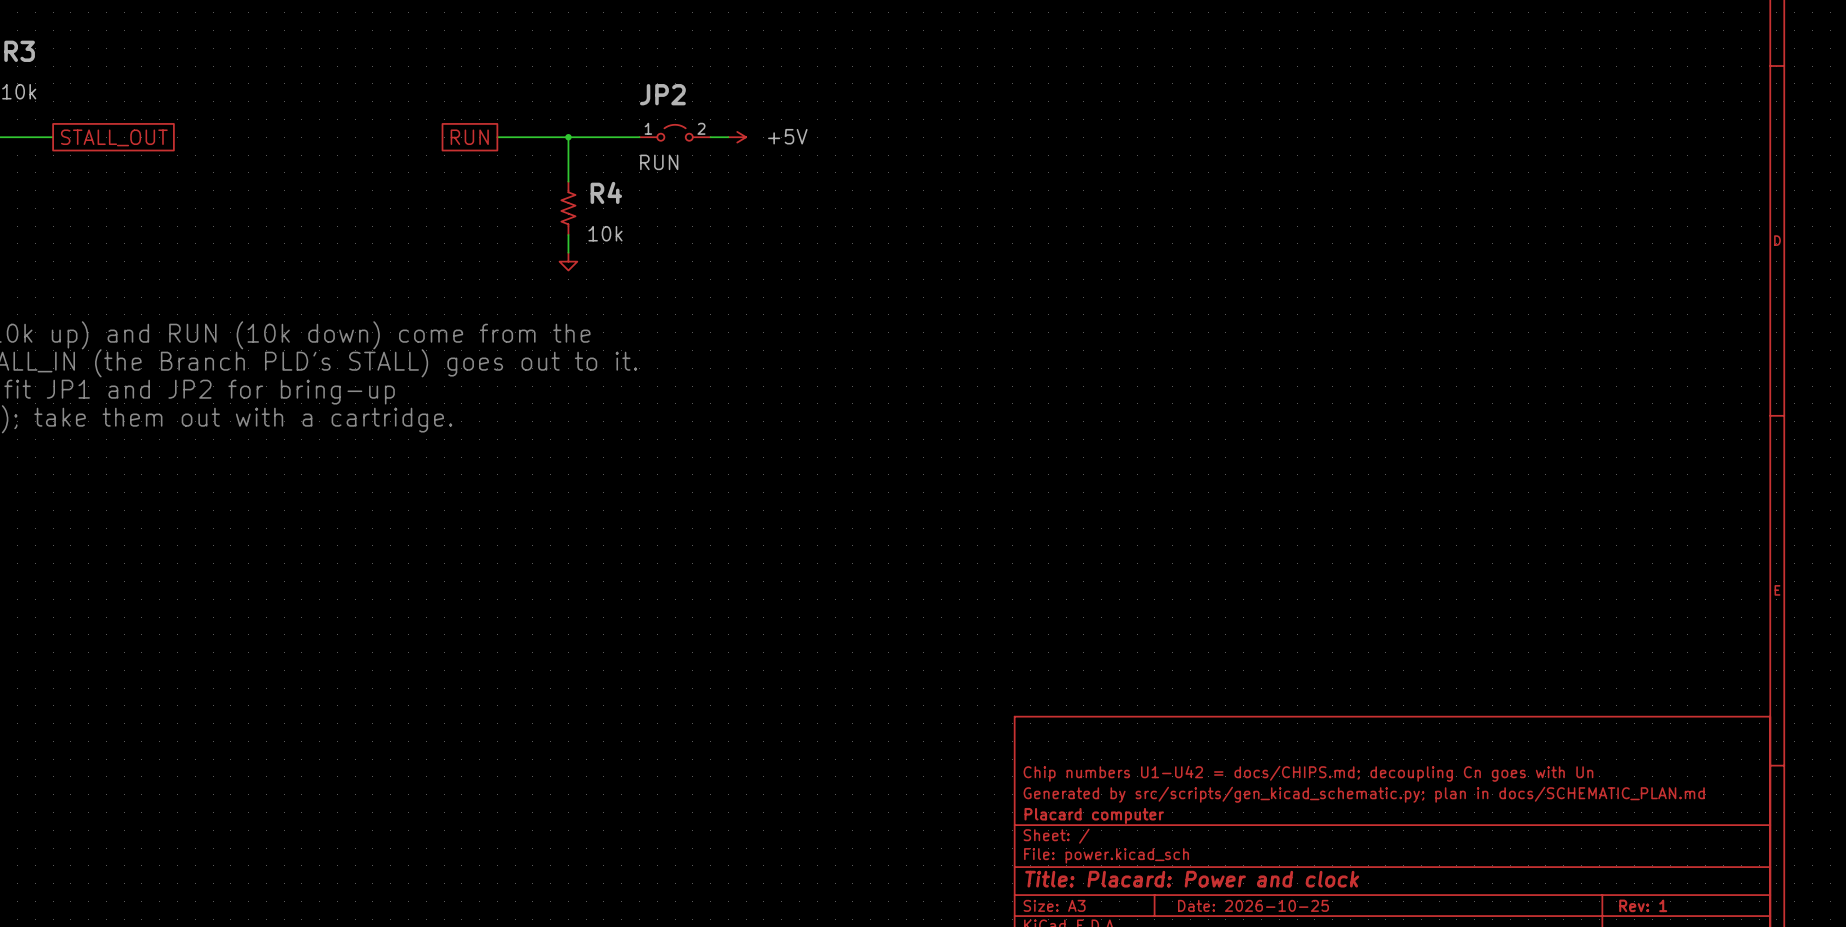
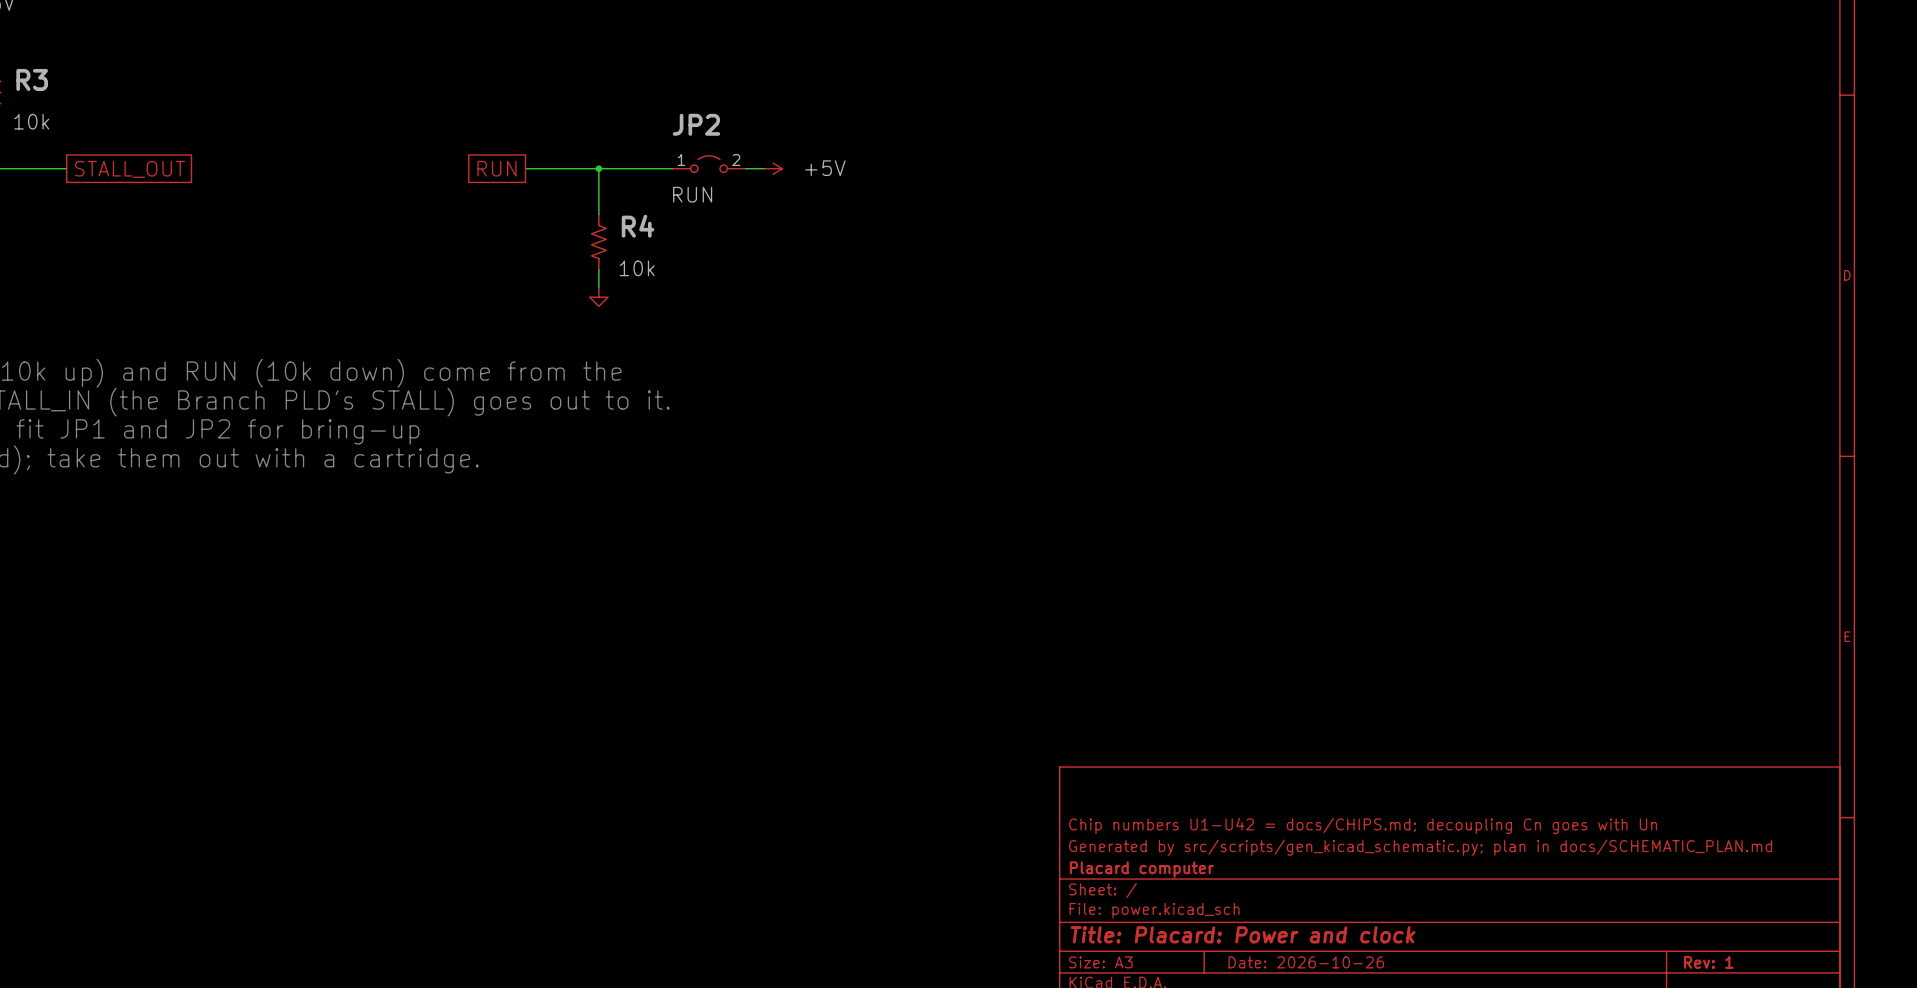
title block: Date: 2026-10-25 (1253, 905) -> Date: 2026-10-26 (1306, 962)

